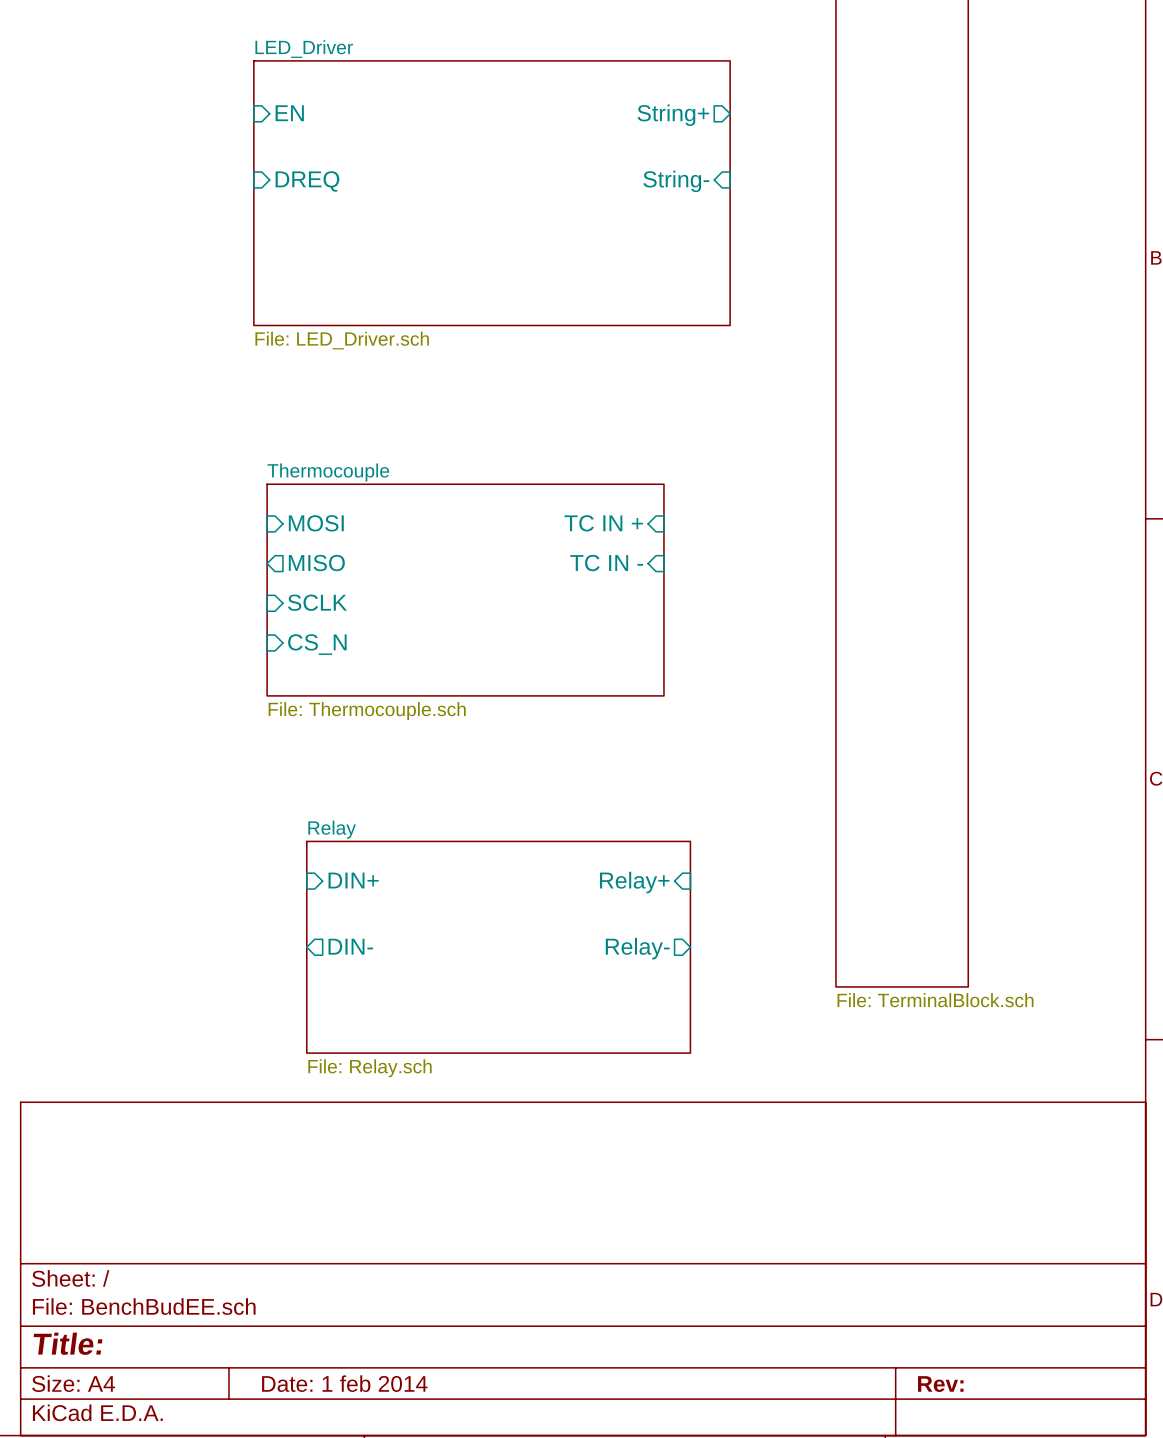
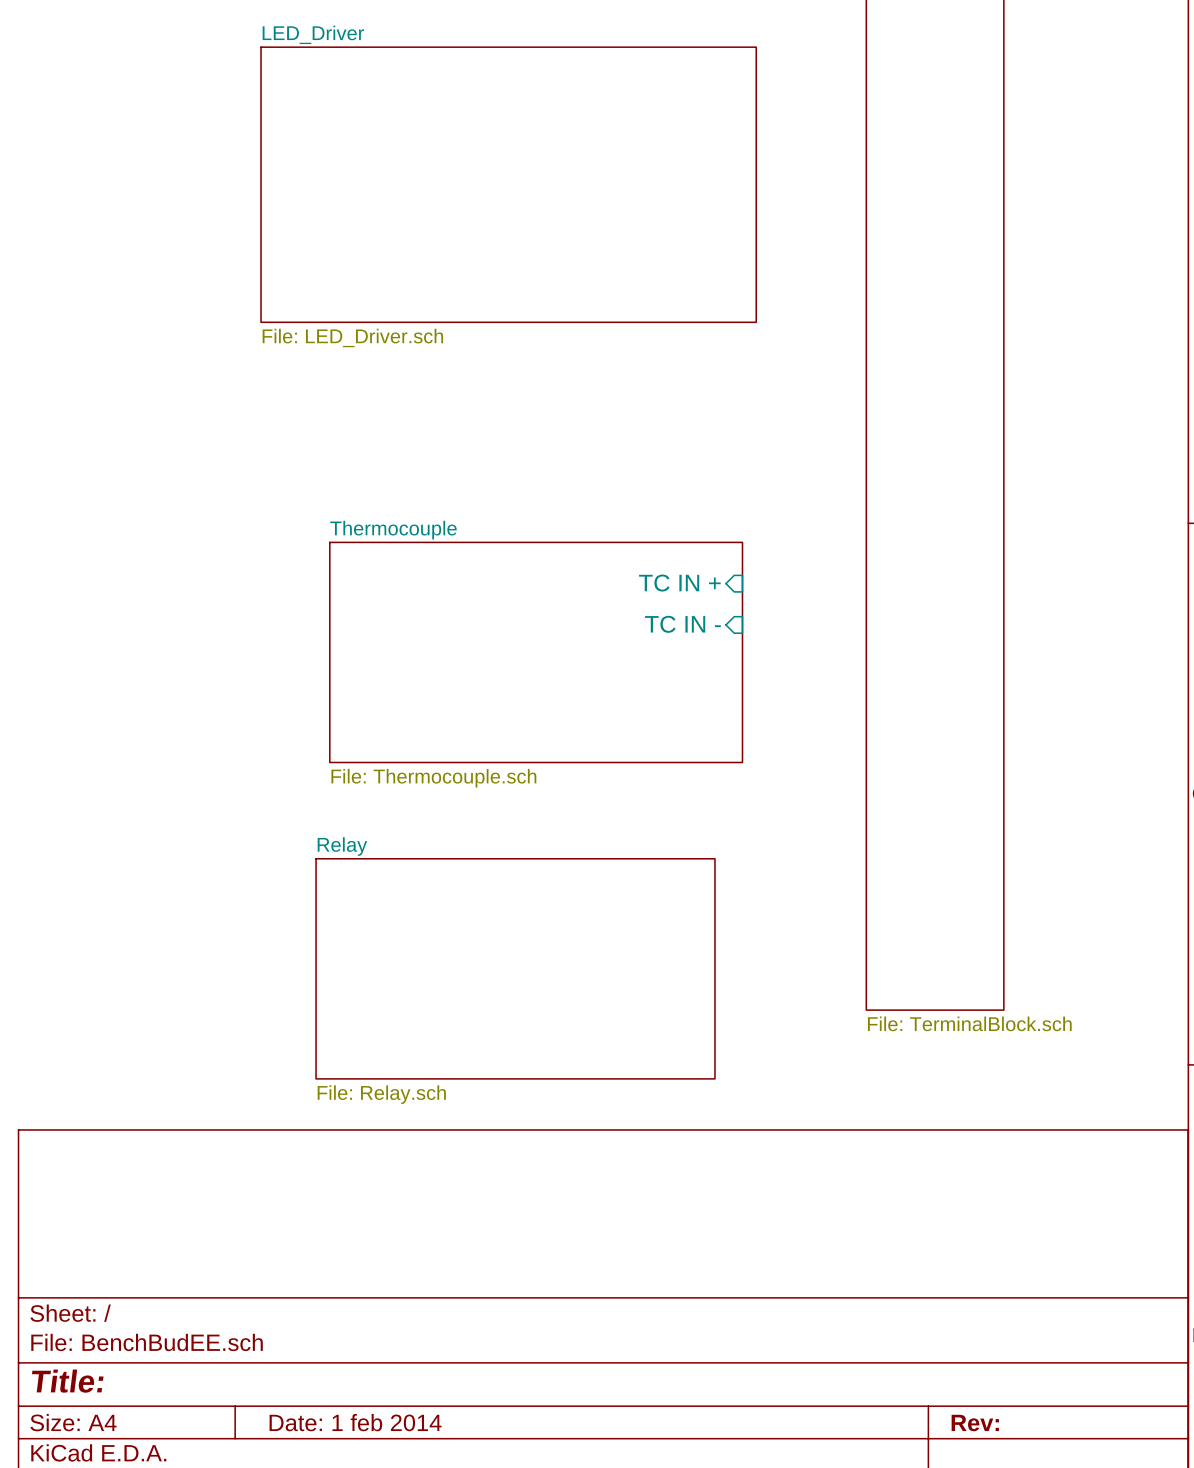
sheet pin: EN (289, 113) -> none
sheet pin: String+ (673, 115) -> none
sheet pin: DREQ (307, 181) -> none
sheet pin: String- (676, 181) -> none
sheet pin: MOSI (316, 523) -> none
sheet pin position: TC IN + (603, 523) -> TC IN + (679, 583)
sheet pin: MISO (316, 563) -> none
sheet pin position: TC IN - (606, 563) -> TC IN - (682, 624)
sheet Thermocouple position: (465, 590) -> (536, 652)
sheet pin: SCLK (317, 602) -> none
sheet pin: CS_N (317, 644) -> none
sheet pin: DIN+ (353, 880) -> none
sheet pin: Relay+ (634, 882) -> none
sheet pin: DIN- (350, 946) -> none
sheet pin: Relay- (637, 948) -> none

